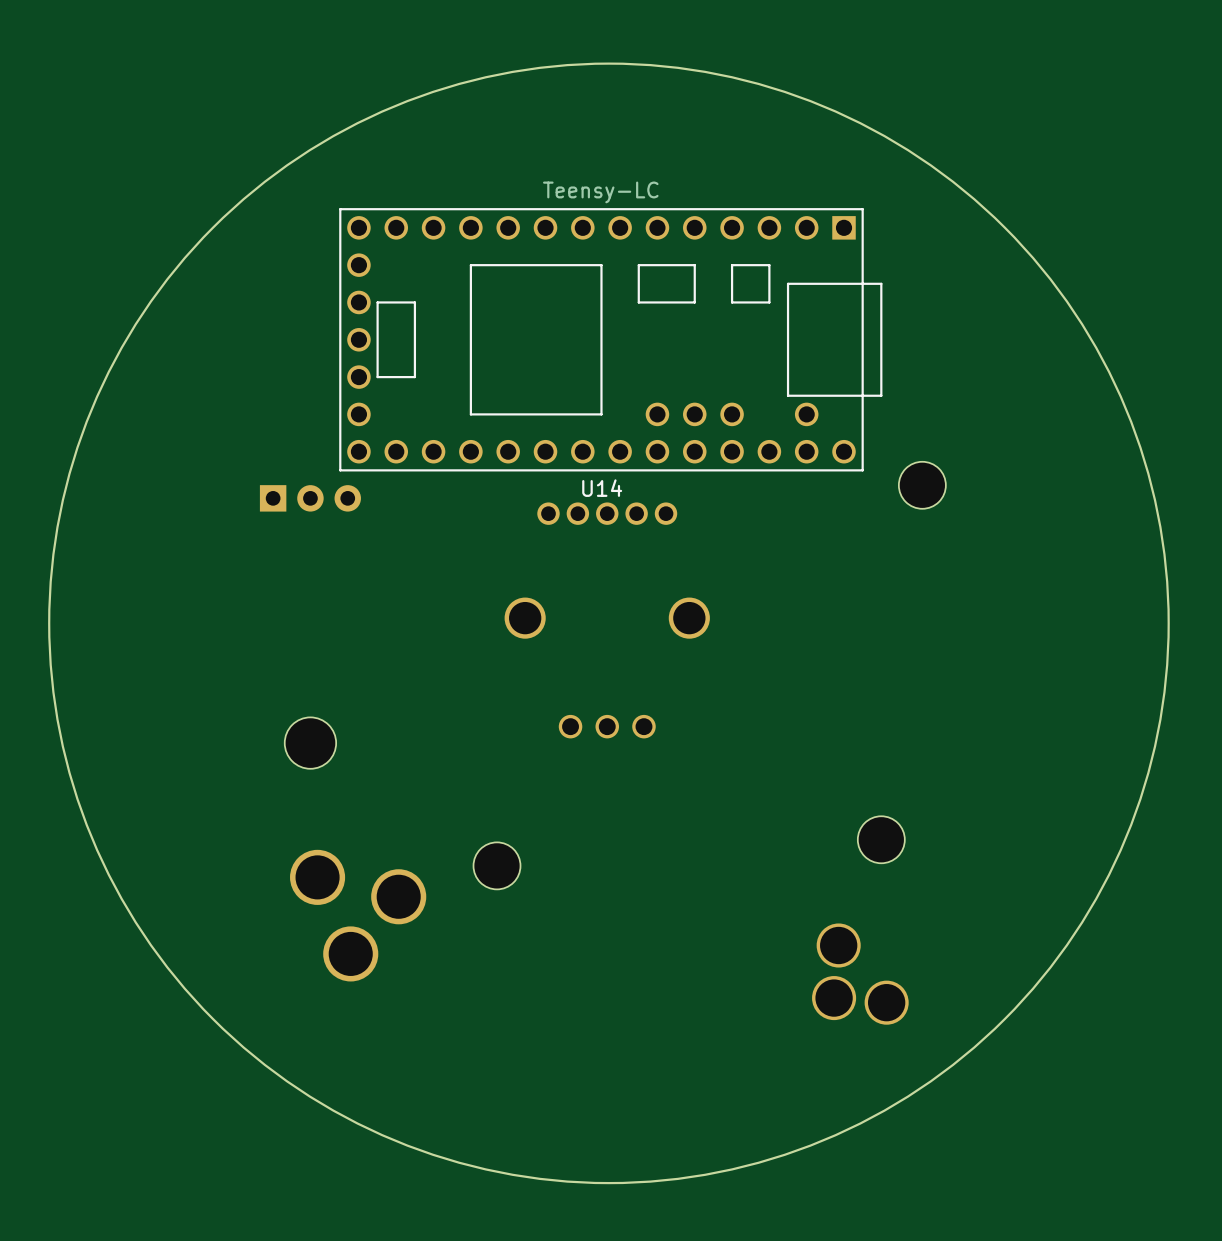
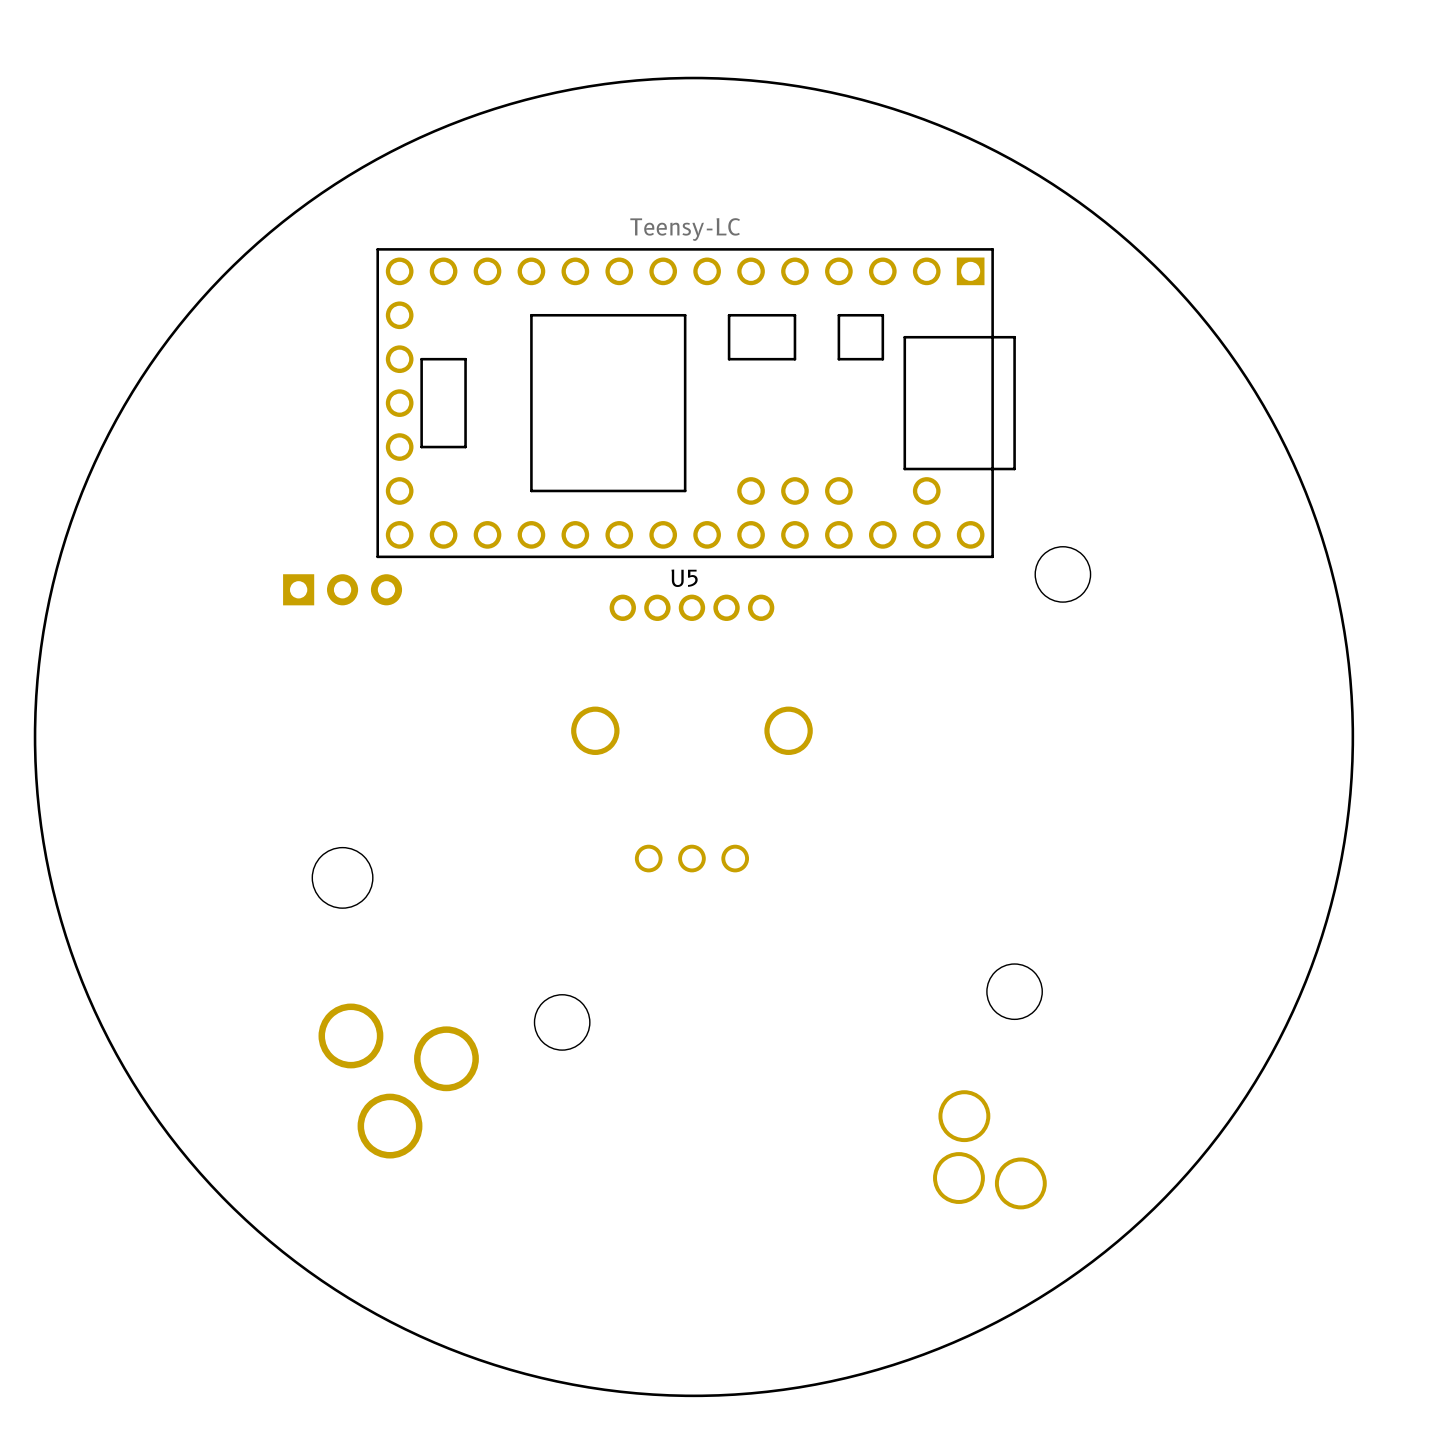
U14 name: U14 (602, 488) -> U5 (684, 578)

